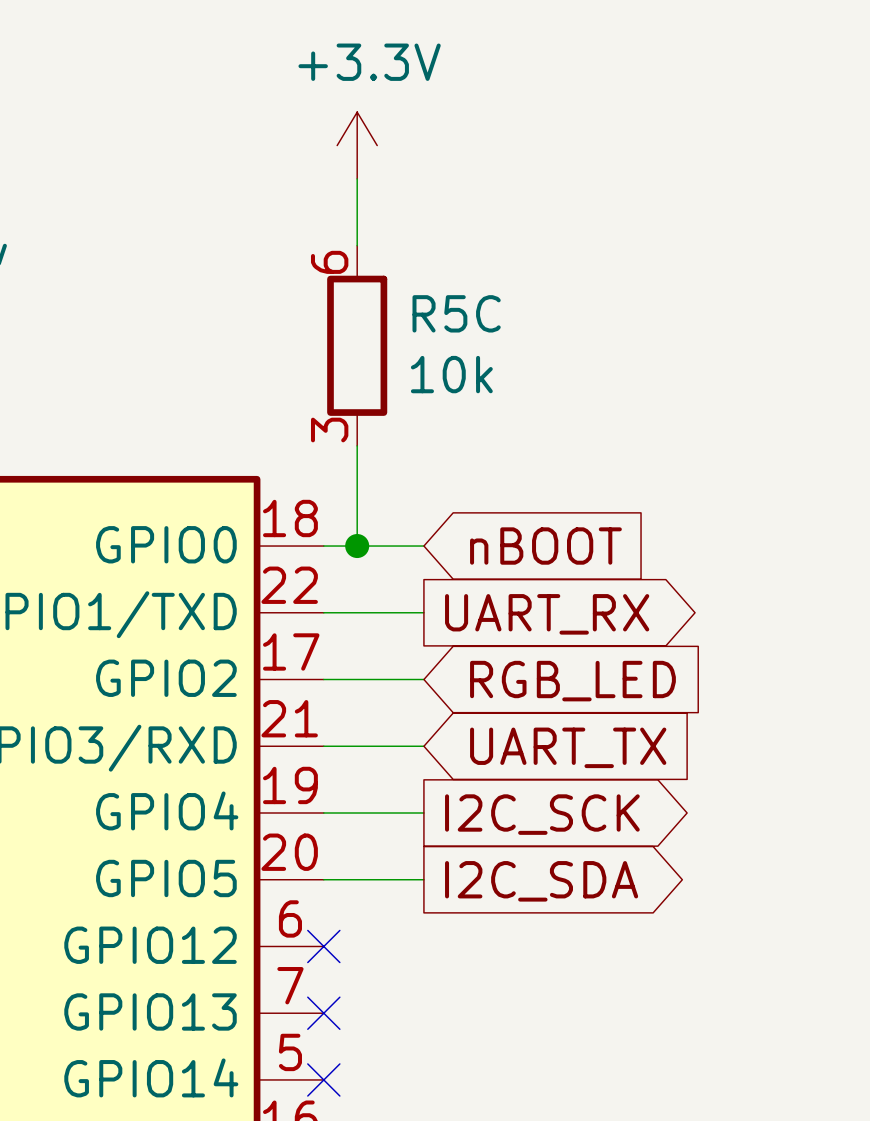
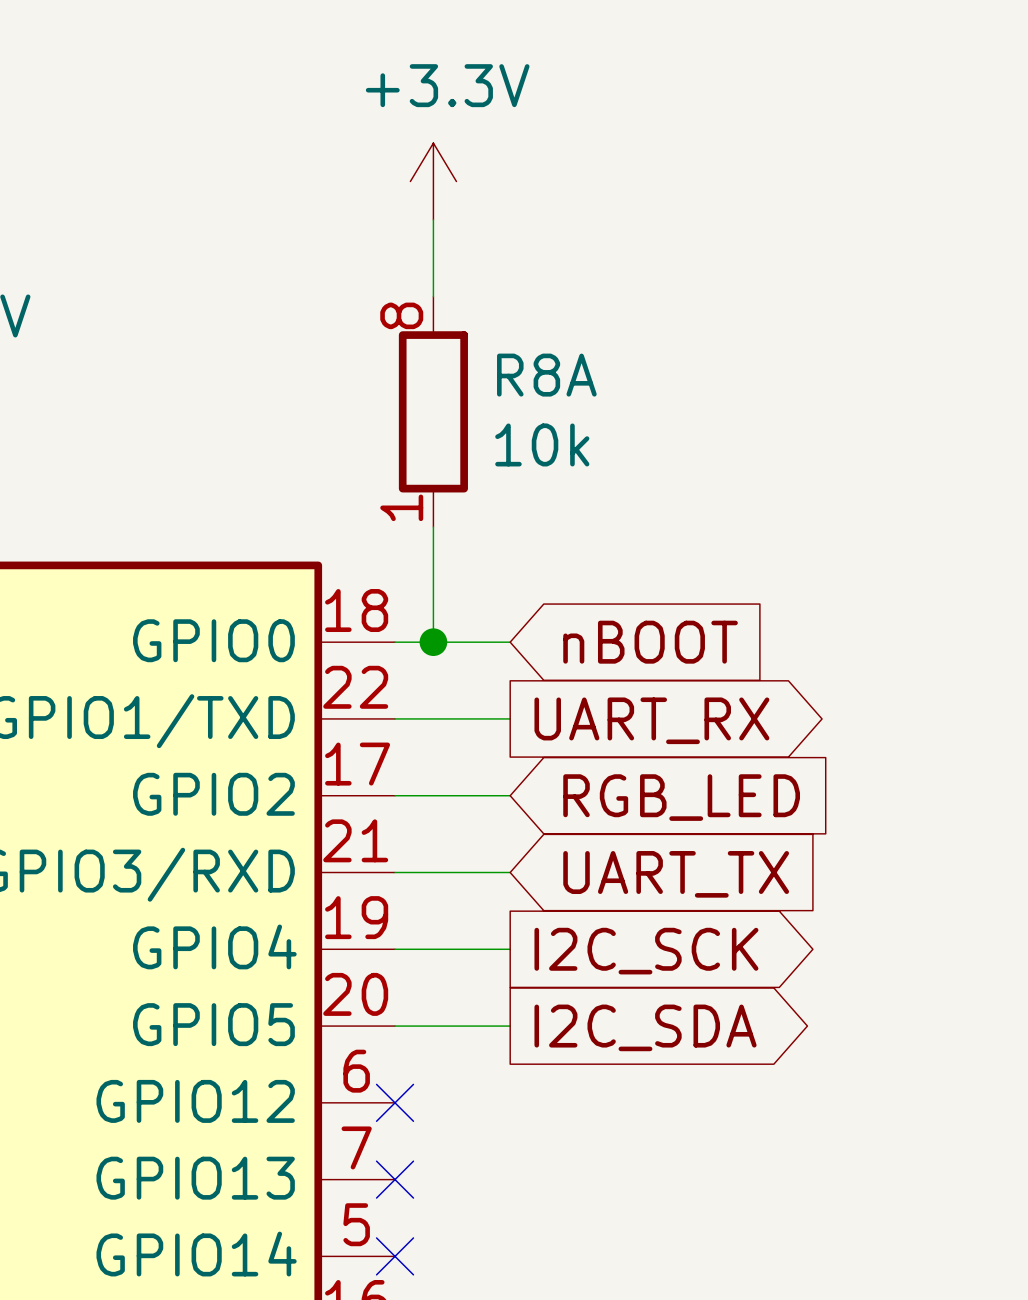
R5C pin number: 6 (329, 262) -> 8 (401, 315)
R5C name: R5C (456, 313) -> R8A (546, 375)
R5C pin number: 3 (329, 430) -> 1 (401, 507)

